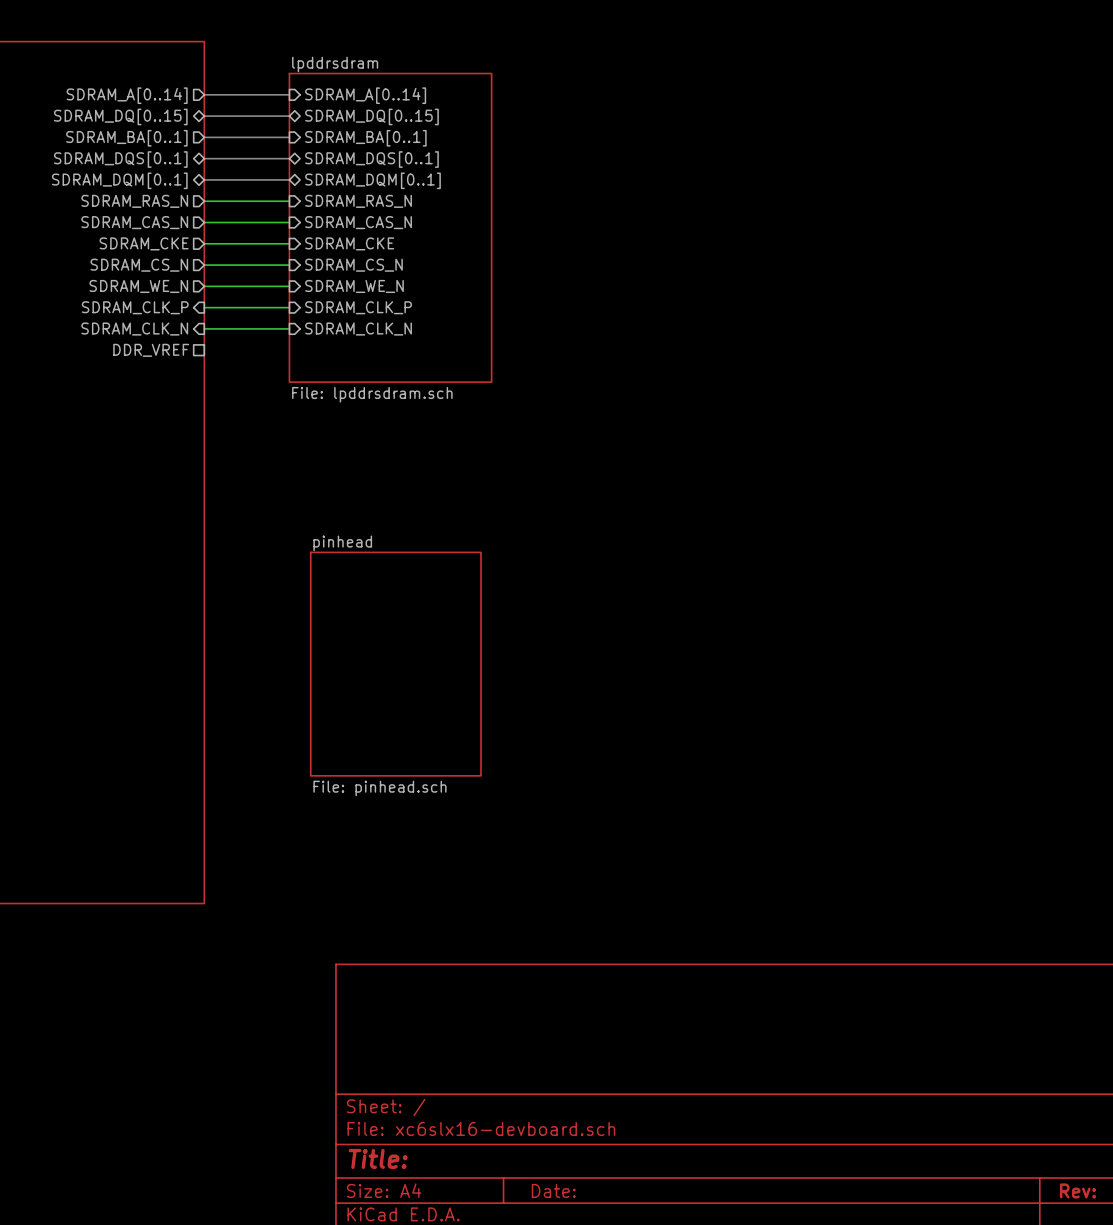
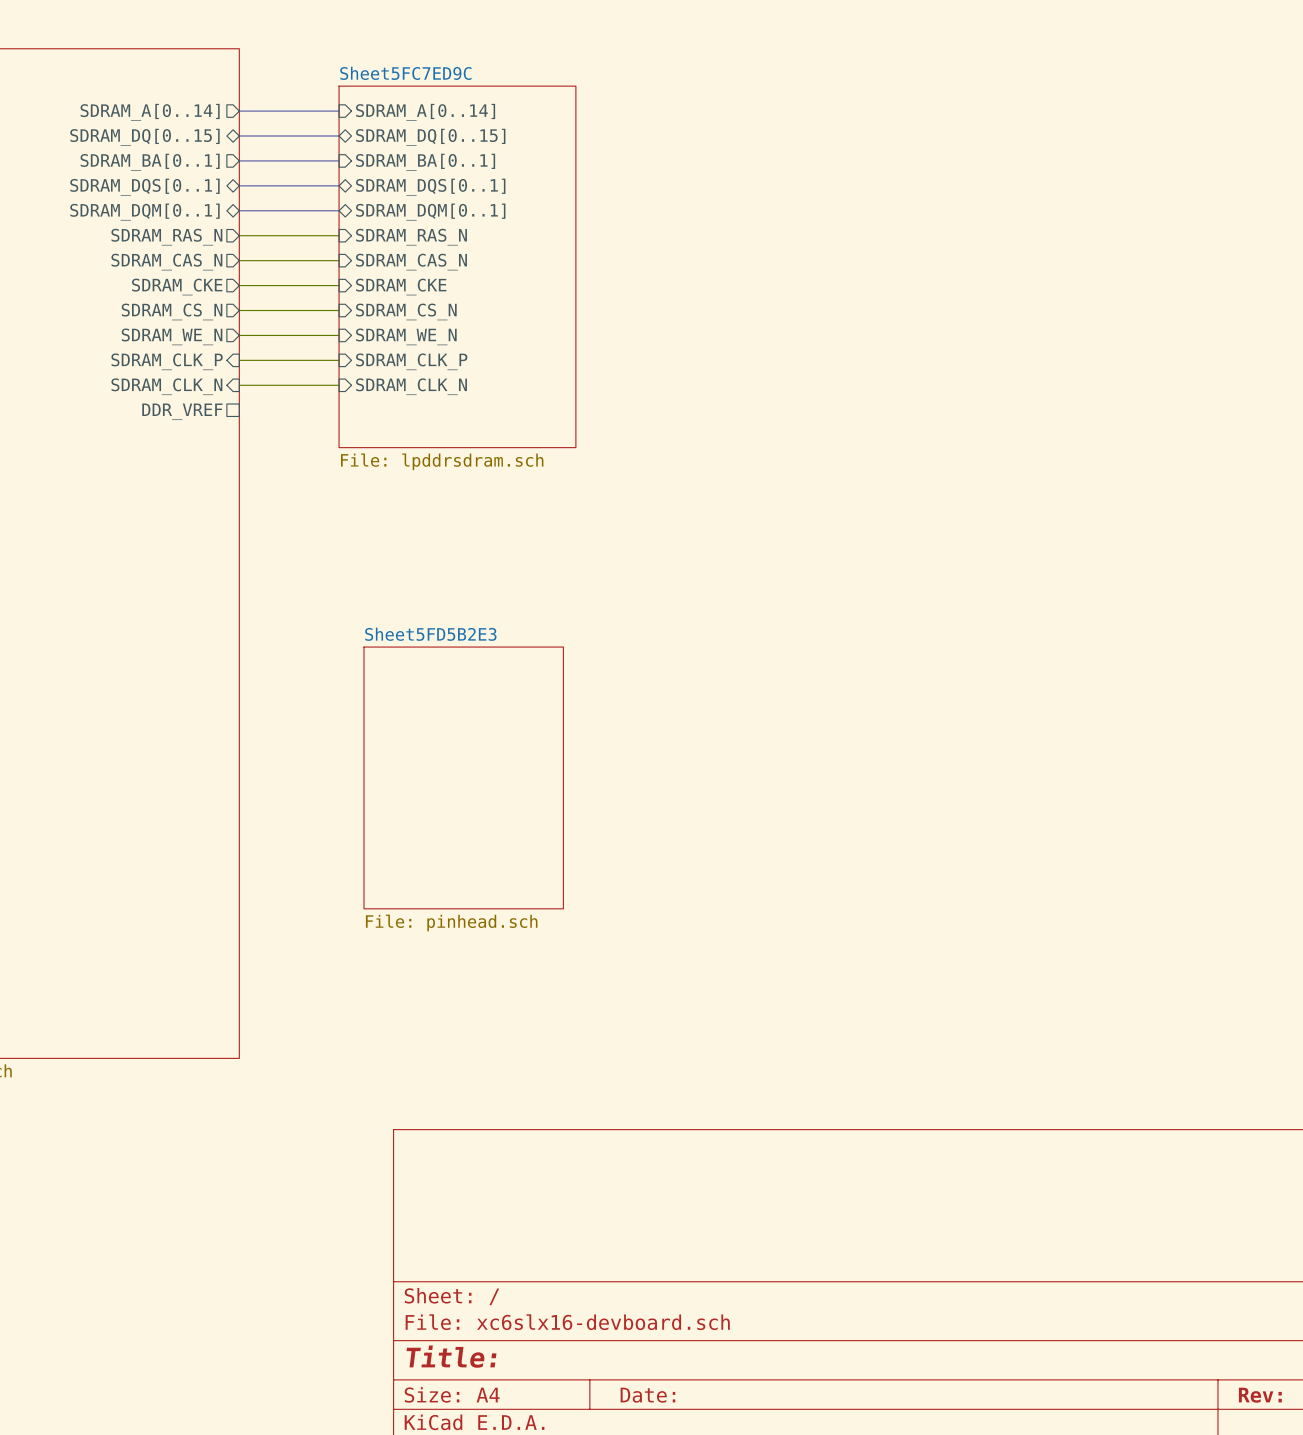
sheet lpddrsdram name: lpddrsdram (335, 64) -> Sheet5FC7ED9C (405, 73)
sheet pinhead name: pinhead (342, 543) -> Sheet5FD5B2E3 (430, 634)

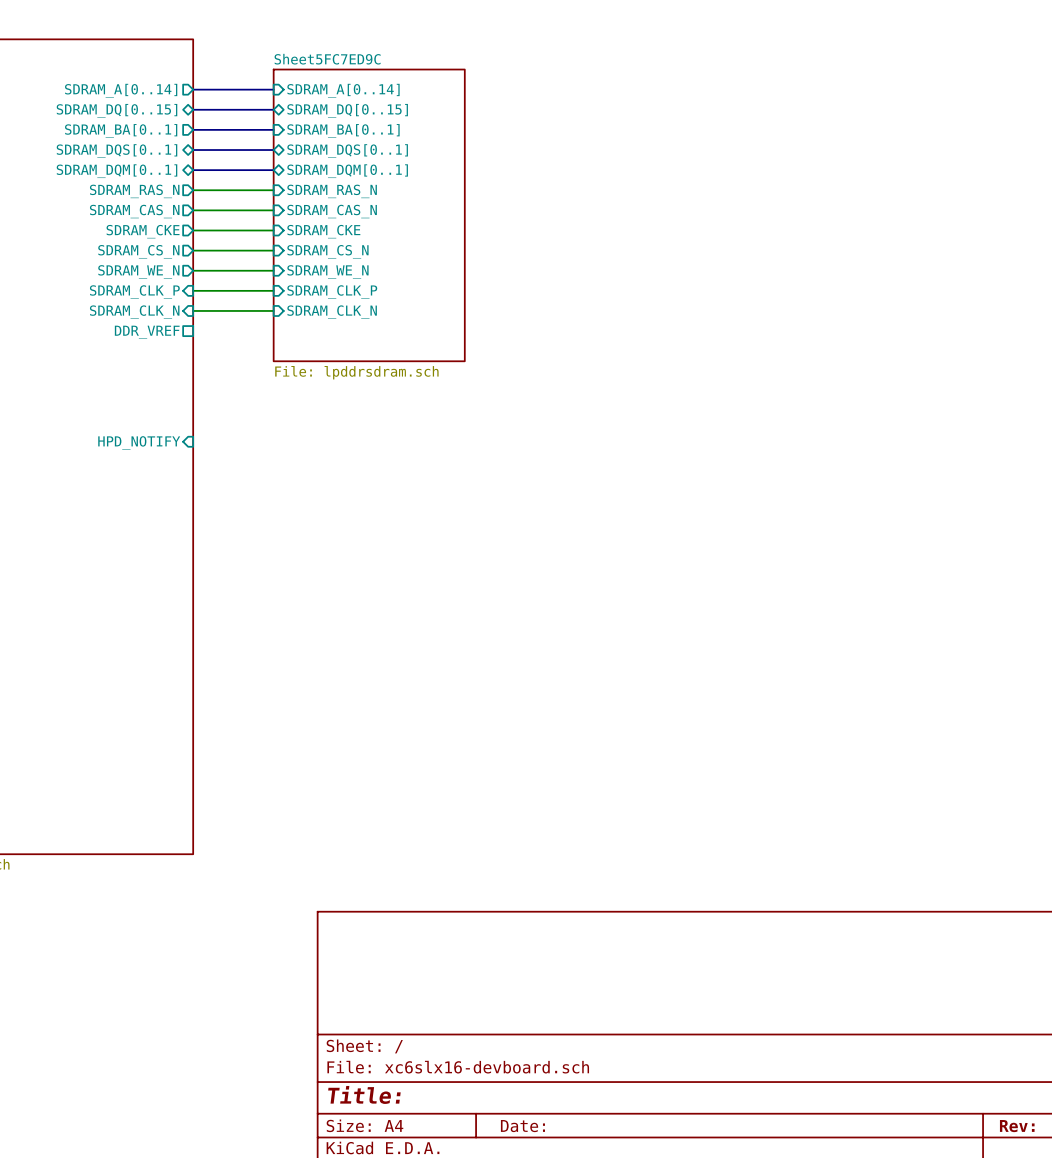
sheet pin: none -> HPD_NOTIFY (139, 442)
sheet Sheet5FD5B2E3: File: pinhead.sch (463, 777) -> none

